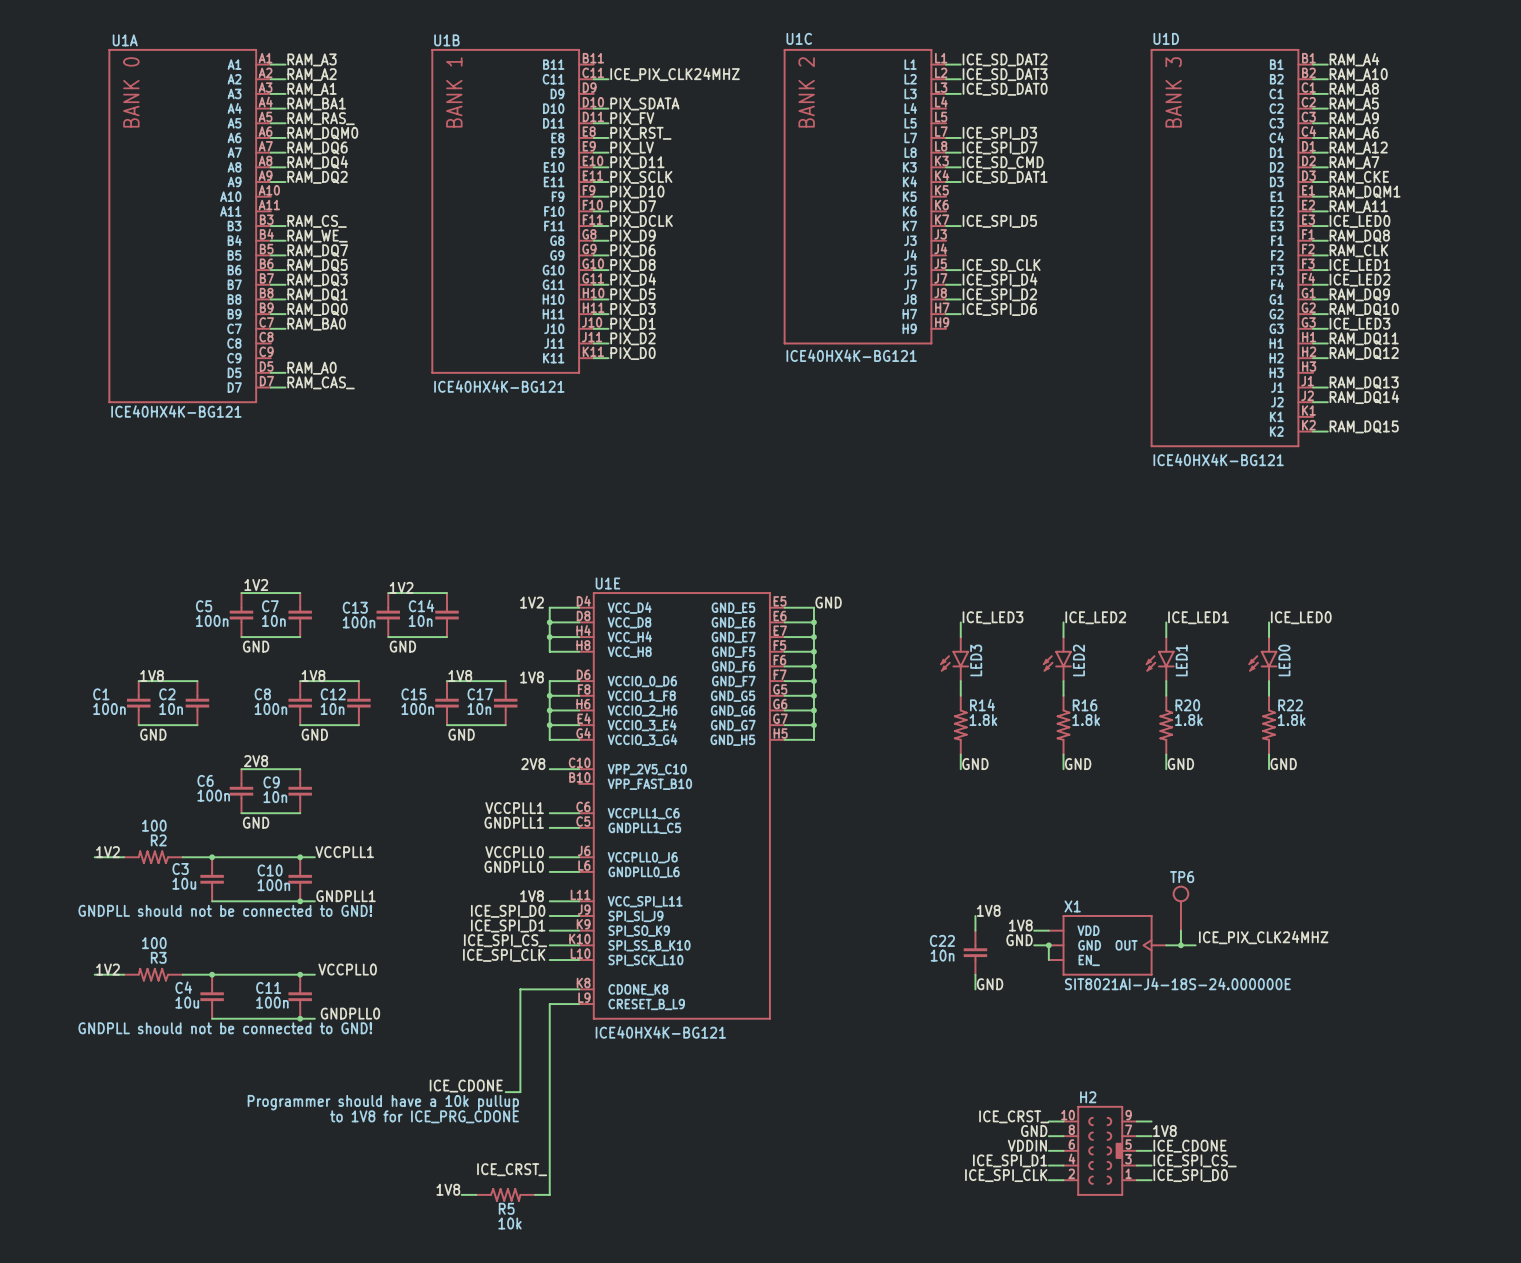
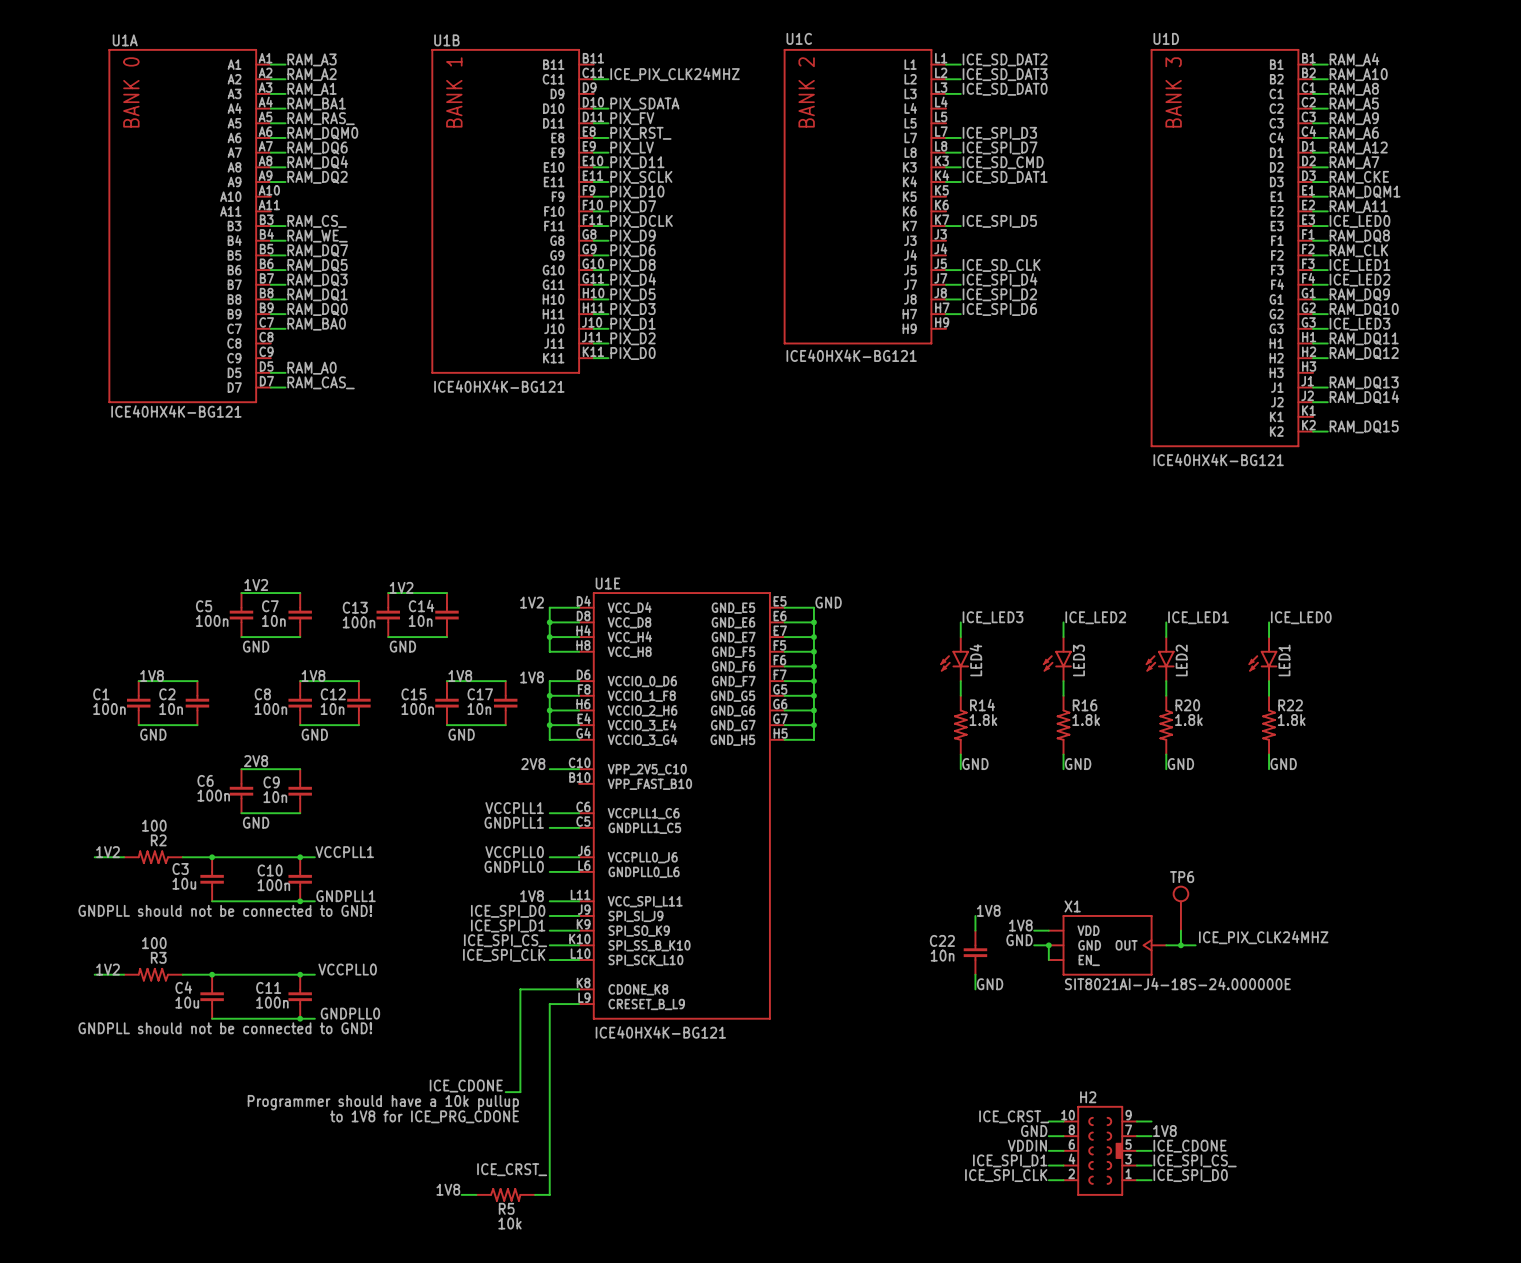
LED3 name: LED3 (976, 660) -> LED4 (975, 660)
LED2 name: LED2 (1078, 660) -> LED3 (1078, 660)
LED1 name: LED1 (1181, 660) -> LED2 (1181, 660)
LED0 name: LED0 (1284, 660) -> LED1 (1284, 660)

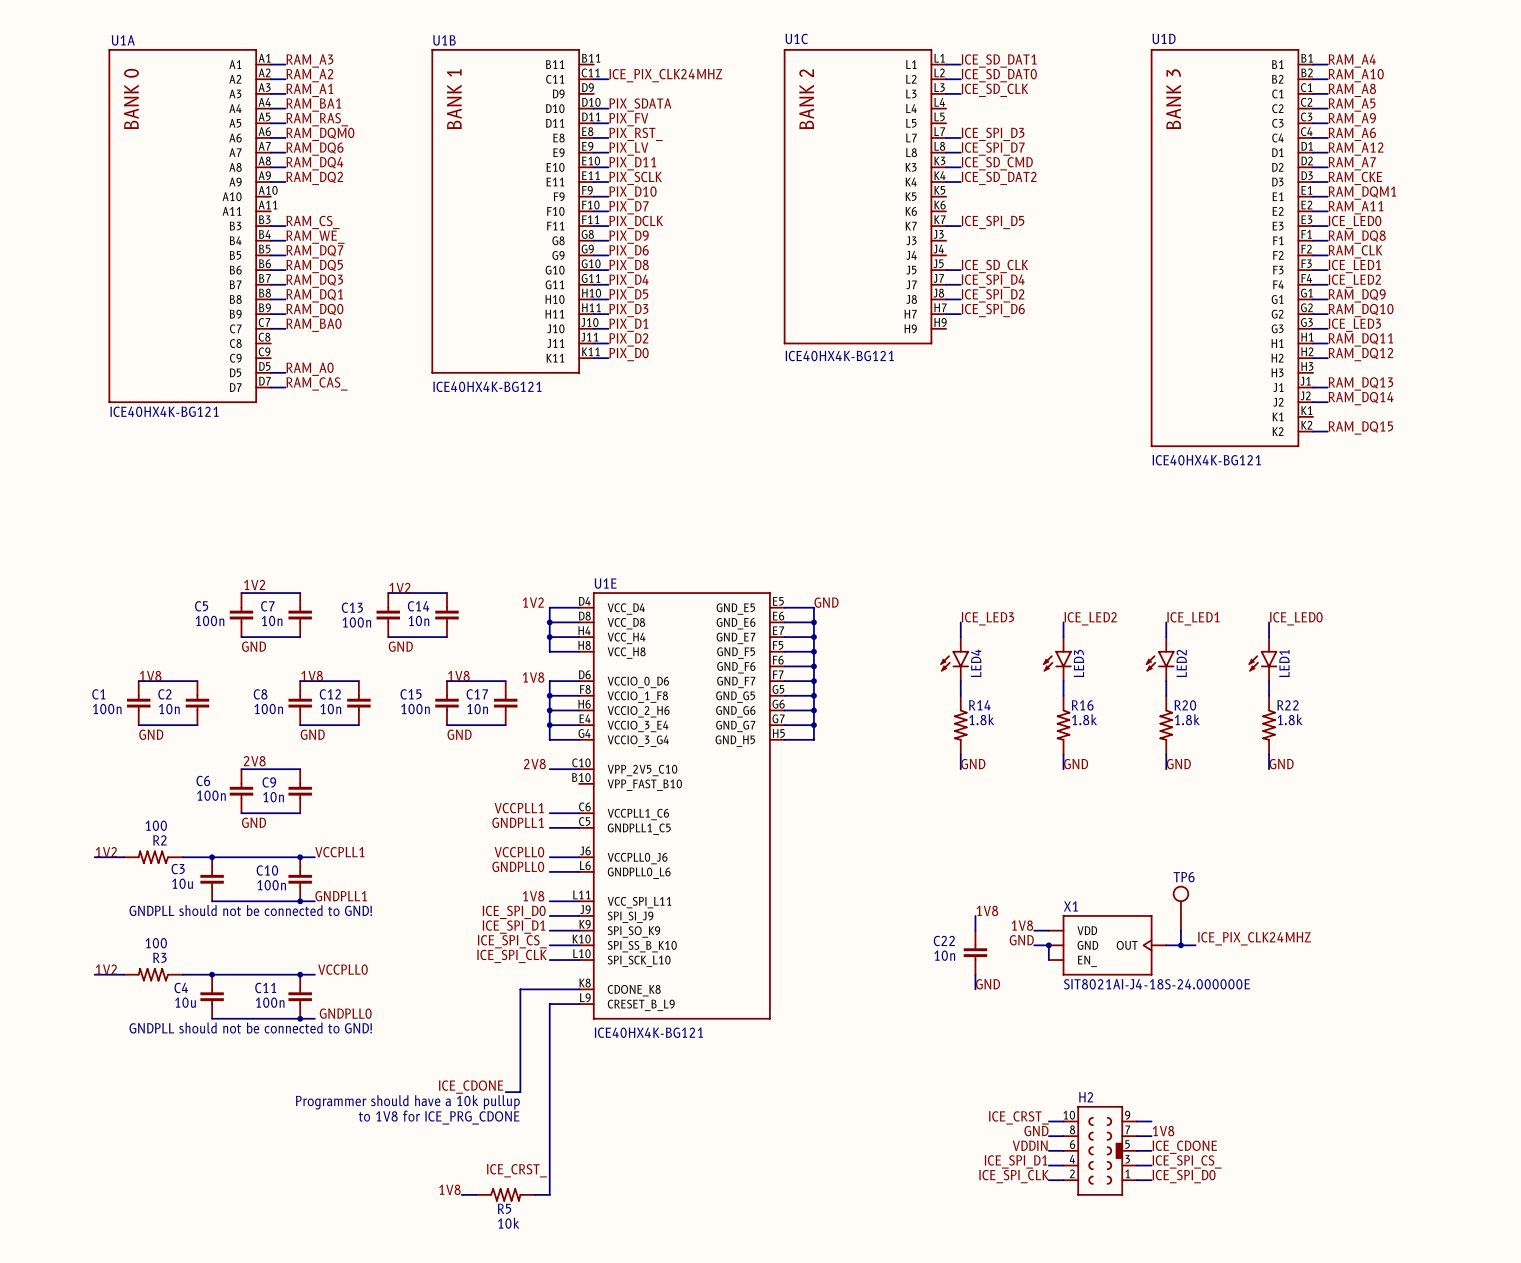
label: ICE_SD_DAT2 (1005, 59) -> ICE_SD_DAT1 (999, 60)
label: ICE_SD_DAT3 (1005, 74) -> ICE_SD_DAT0 (999, 75)
label: ICE_SD_DAT0 (1005, 89) -> ICE_SD_CLK (994, 90)
label: ICE_SD_DAT1 (1005, 177) -> ICE_SD_DAT2 (999, 178)

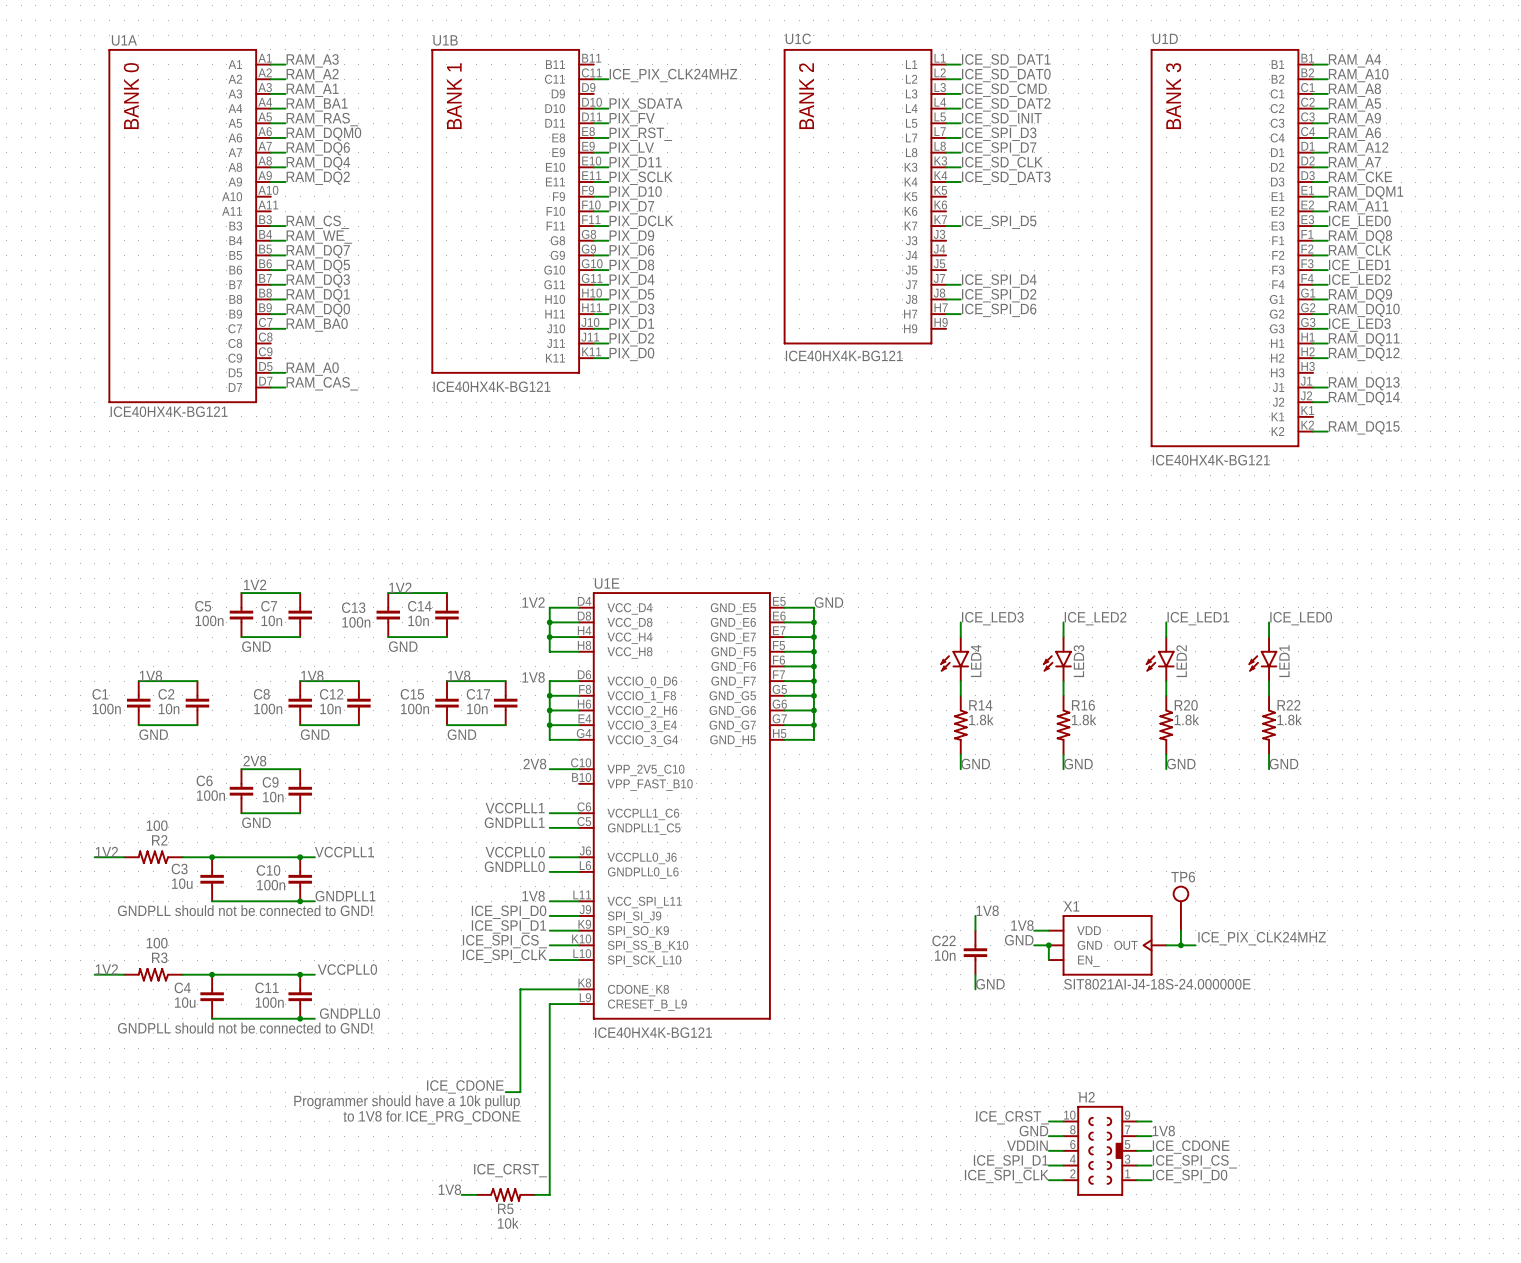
label: ICE_SD_CLK (994, 90) -> ICE_SD_CMD (1004, 90)
label: none -> ICE_SD_DAT2 (1006, 104)
wire: none -> (946, 108) (960, 108)
label: none -> ICE_SD_INIT (1001, 119)
wire: none -> (946, 123) (960, 123)
label: ICE_SD_CMD (997, 163) -> ICE_SD_CLK (1002, 163)
label: ICE_SD_DAT2 (999, 178) -> ICE_SD_DAT3 (1006, 178)
label: ICE_SD_CLK (994, 266) -> none
wire: (946, 270) (960, 270) -> none

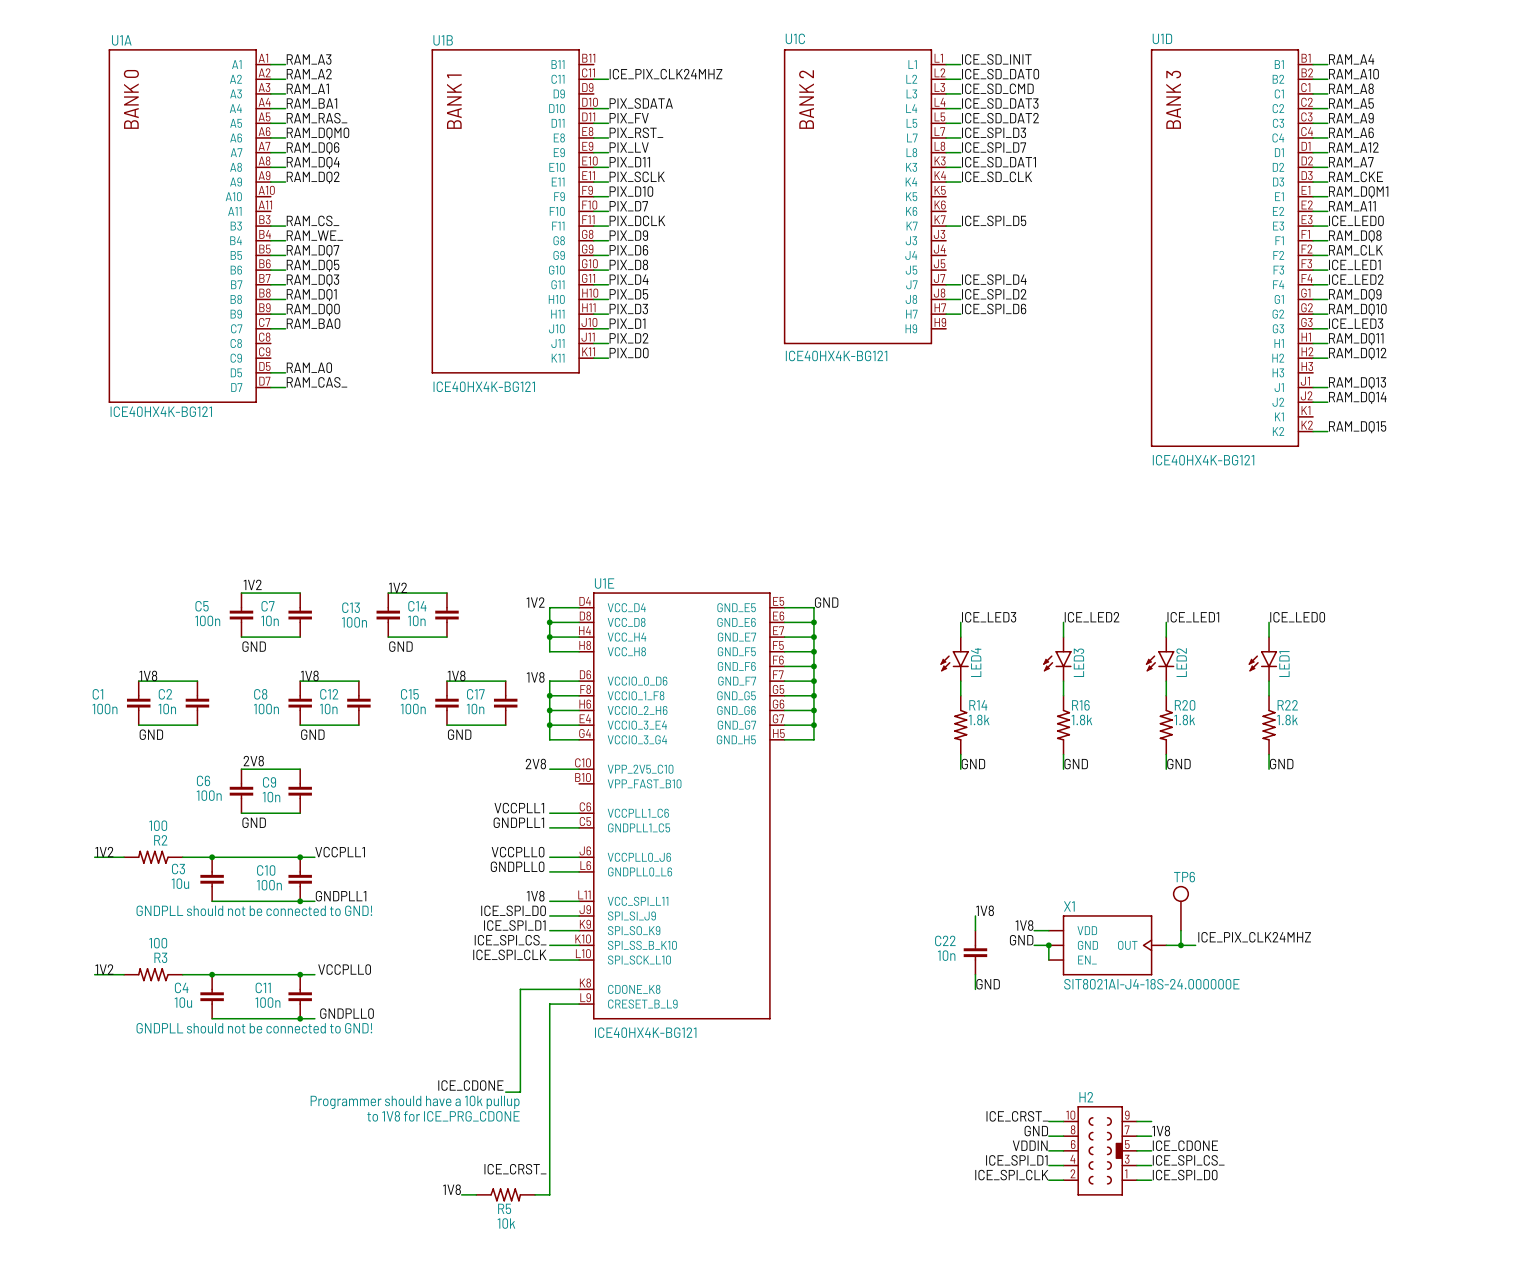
label: ICE_SD_DAT1 (1006, 60) -> ICE_SD_INIT (996, 59)
label: ICE_SD_DAT2 (1006, 104) -> ICE_SD_DAT3 (1000, 103)
label: ICE_SD_INIT (1001, 119) -> ICE_SD_DAT2 (1000, 118)
label: ICE_SD_CLK (1002, 163) -> ICE_SD_DAT1 (998, 162)
label: ICE_SD_DAT3 (1006, 178) -> ICE_SD_CLK (997, 176)

